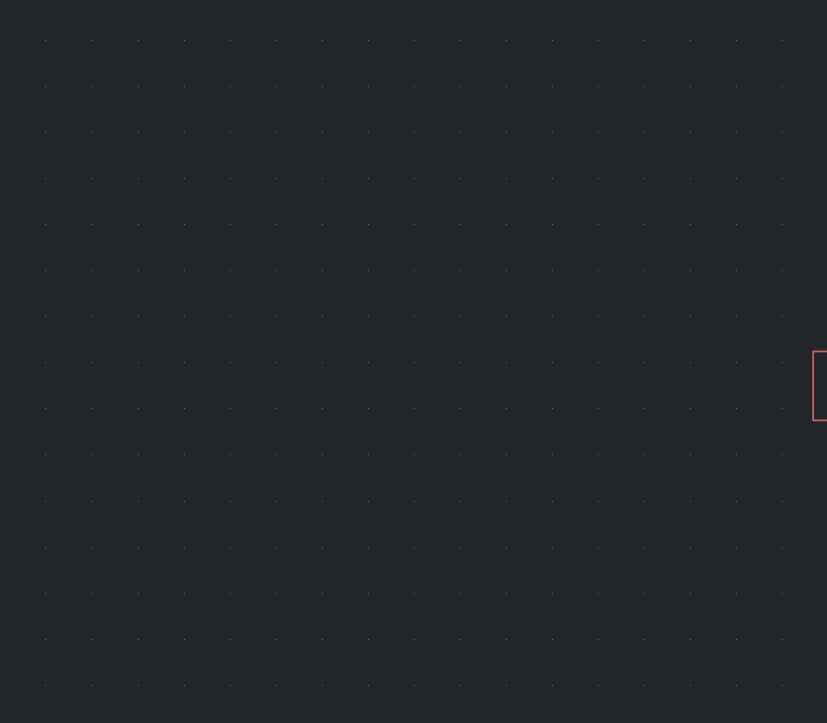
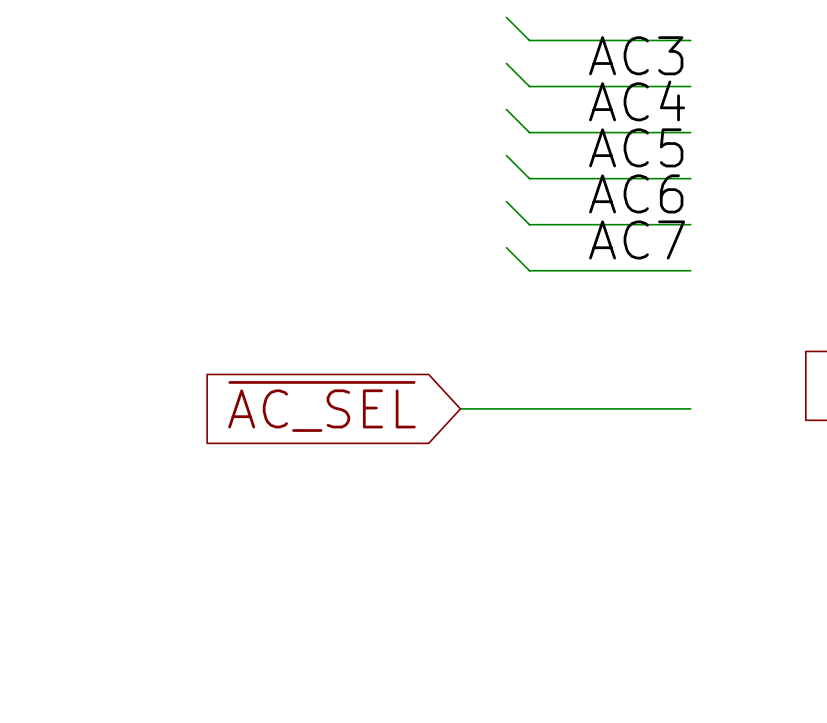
wire: none -> (506, 17) (529, 40) (690, 40)
label: none -> AC3 (636, 55)
wire: none -> (506, 63) (529, 86) (690, 86)
label: none -> AC4 (637, 100)
wire: none -> (506, 109) (529, 132) (690, 132)
label: none -> AC5 (636, 147)
wire: none -> (506, 155) (529, 178) (690, 178)
label: none -> AC6 (636, 193)
wire: none -> (506, 201) (529, 224) (690, 224)
label: none -> AC7 (637, 239)
wire: none -> (506, 247) (529, 270) (690, 270)
wire: none -> (460, 408) (690, 408)
global label: none -> ~{AC_SEL} (321, 406)

